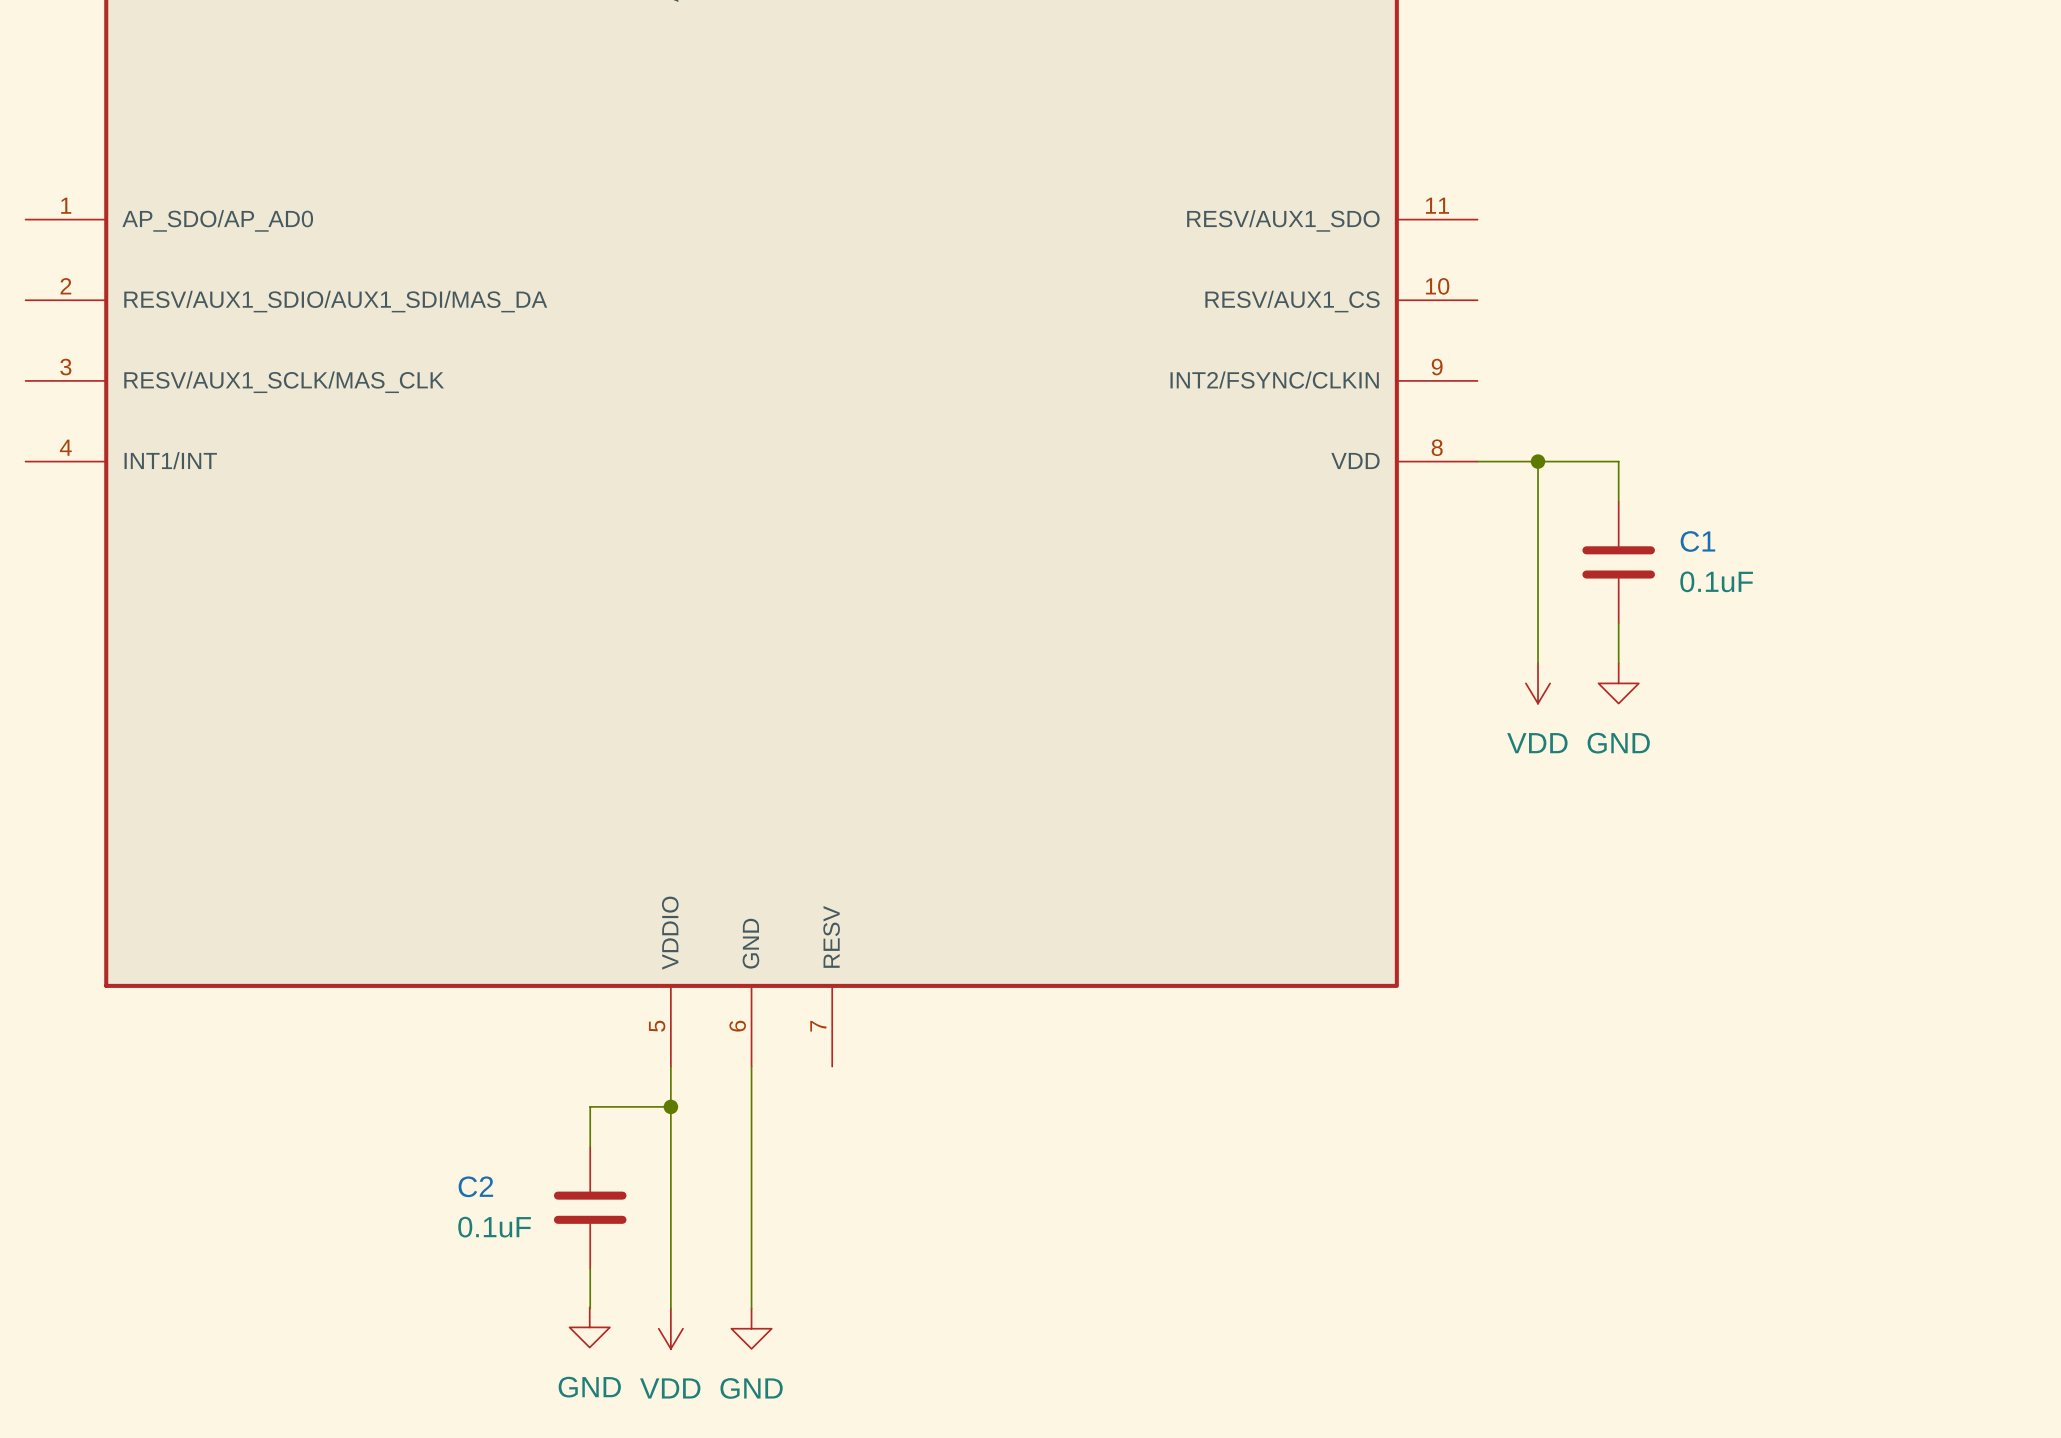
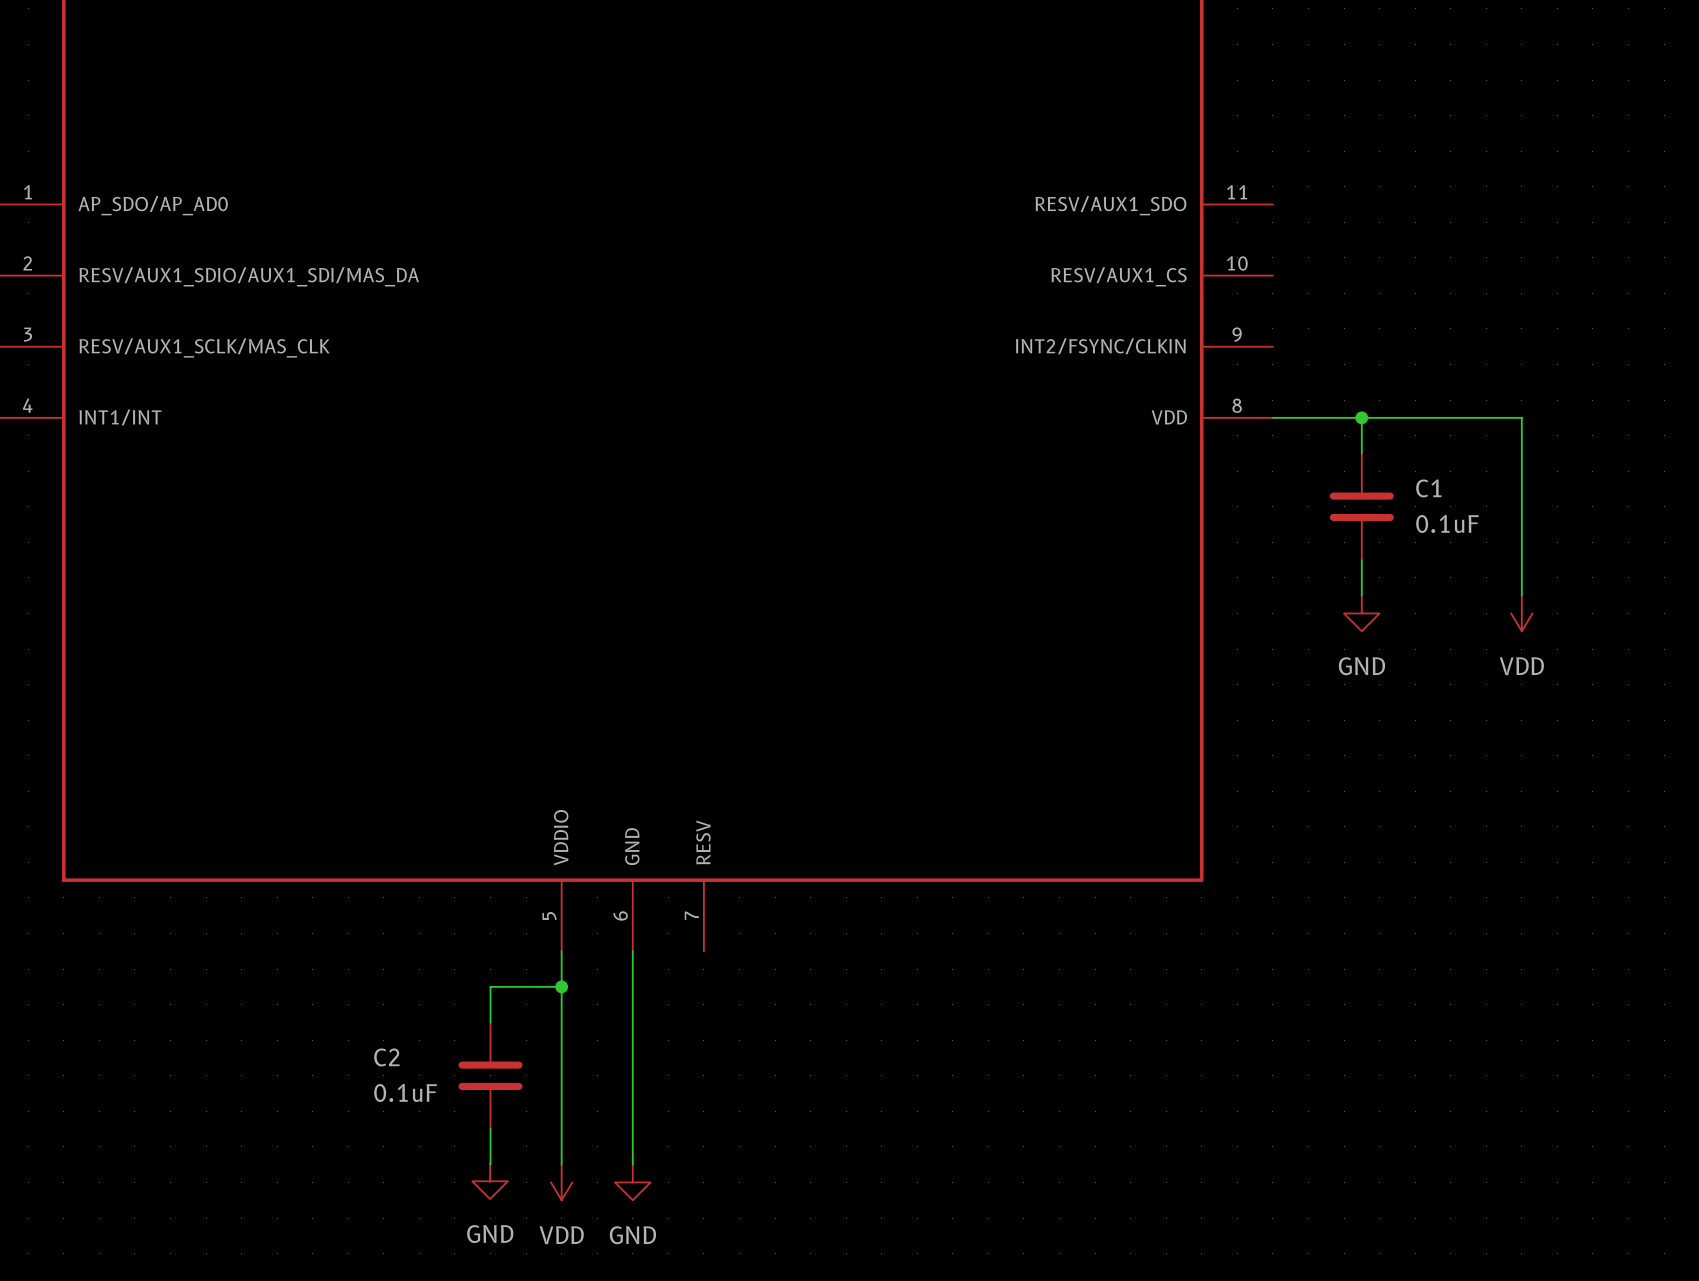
wire: (1538, 461) (1538, 663) -> none
junction position: (1538, 461) -> (1361, 417)
wire: none -> (1361, 417) (1361, 453)
wire: (1618, 461) (1618, 501) -> (1397, 417) (1521, 417) (1521, 595)
C1 position: (1618, 562) -> (1361, 506)
wire: (1618, 622) (1618, 663) -> (1361, 560) (1361, 595)
power symbol position: VDD (1538, 683) -> VDD (1521, 613)
power symbol position: GND (1618, 683) -> GND (1361, 613)

